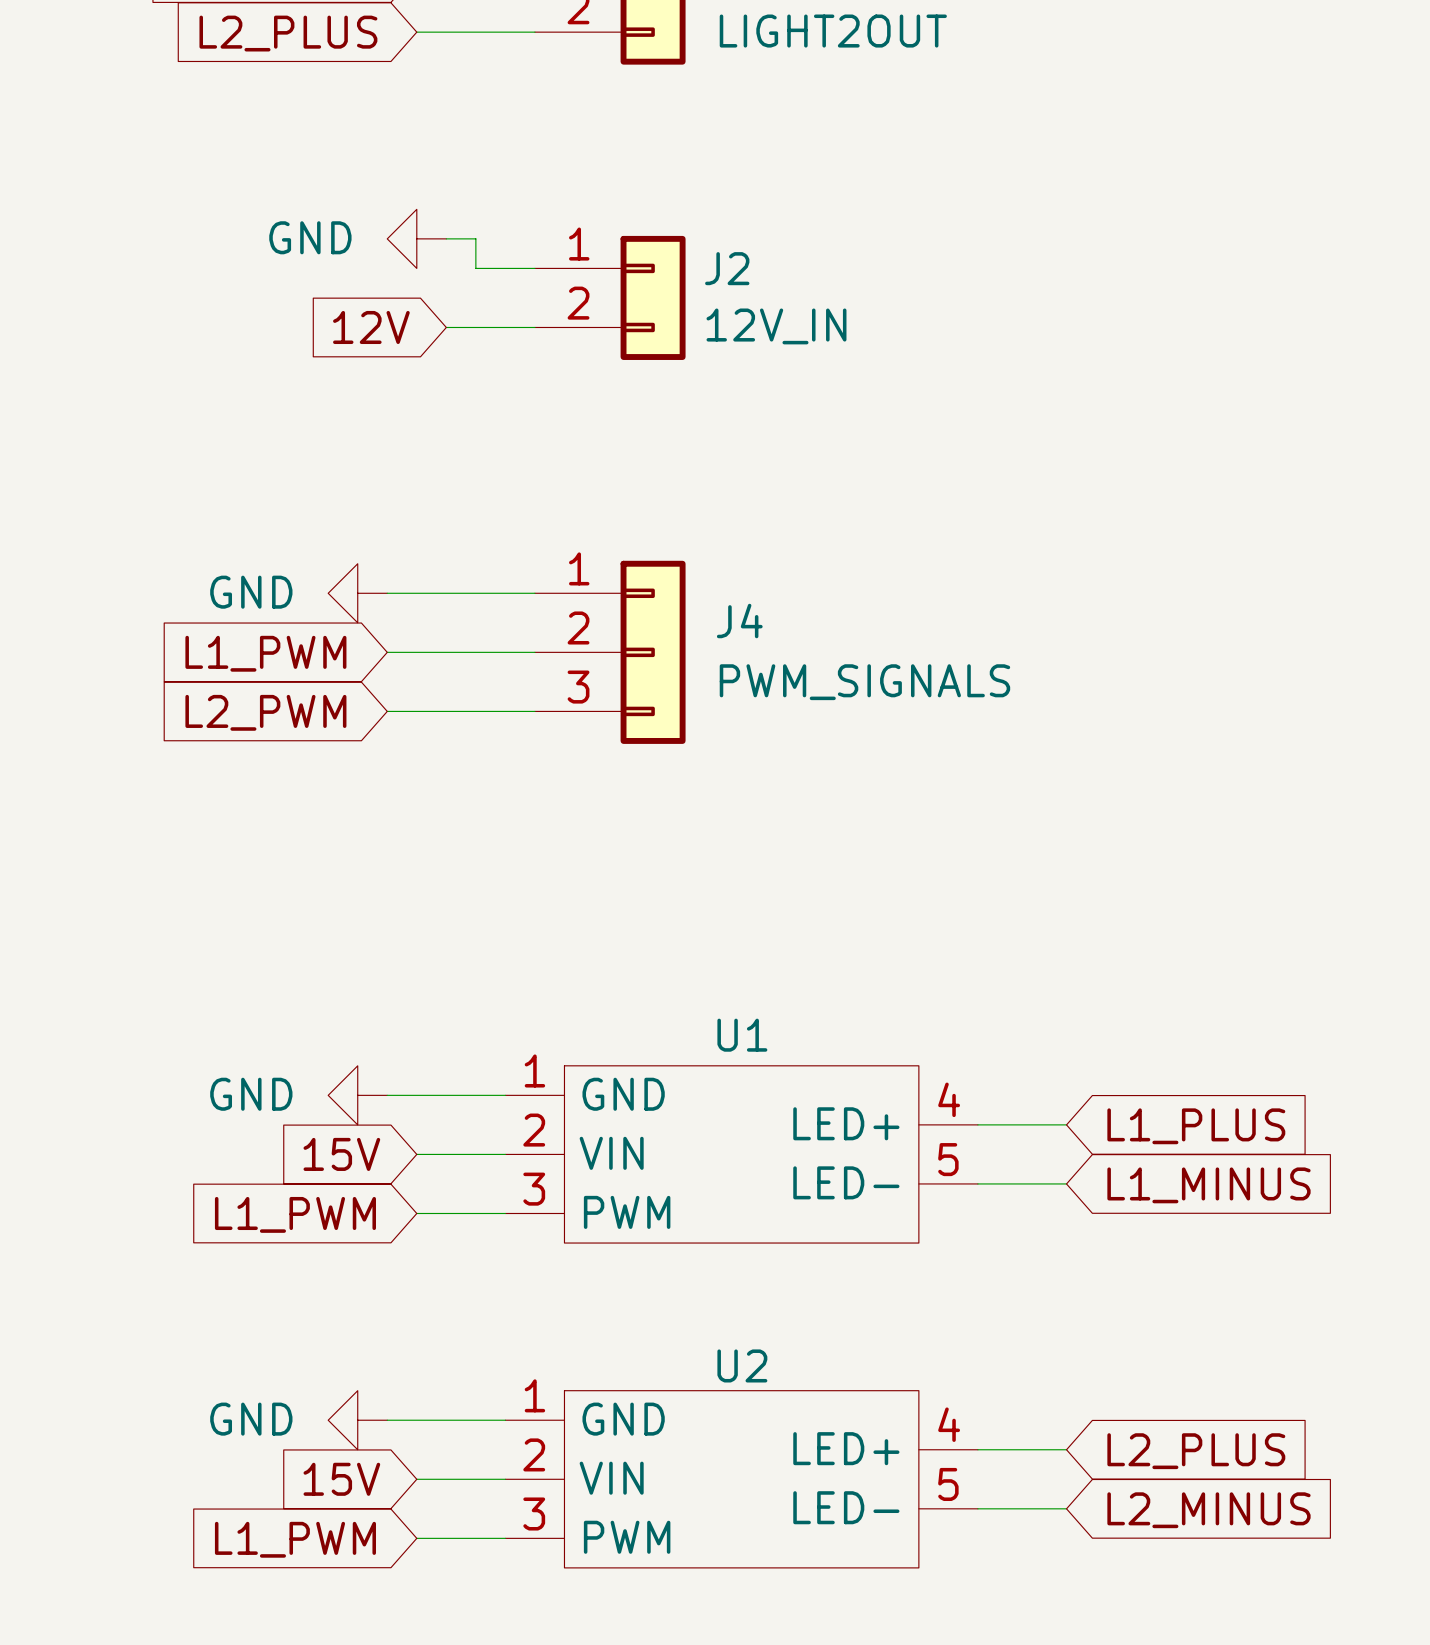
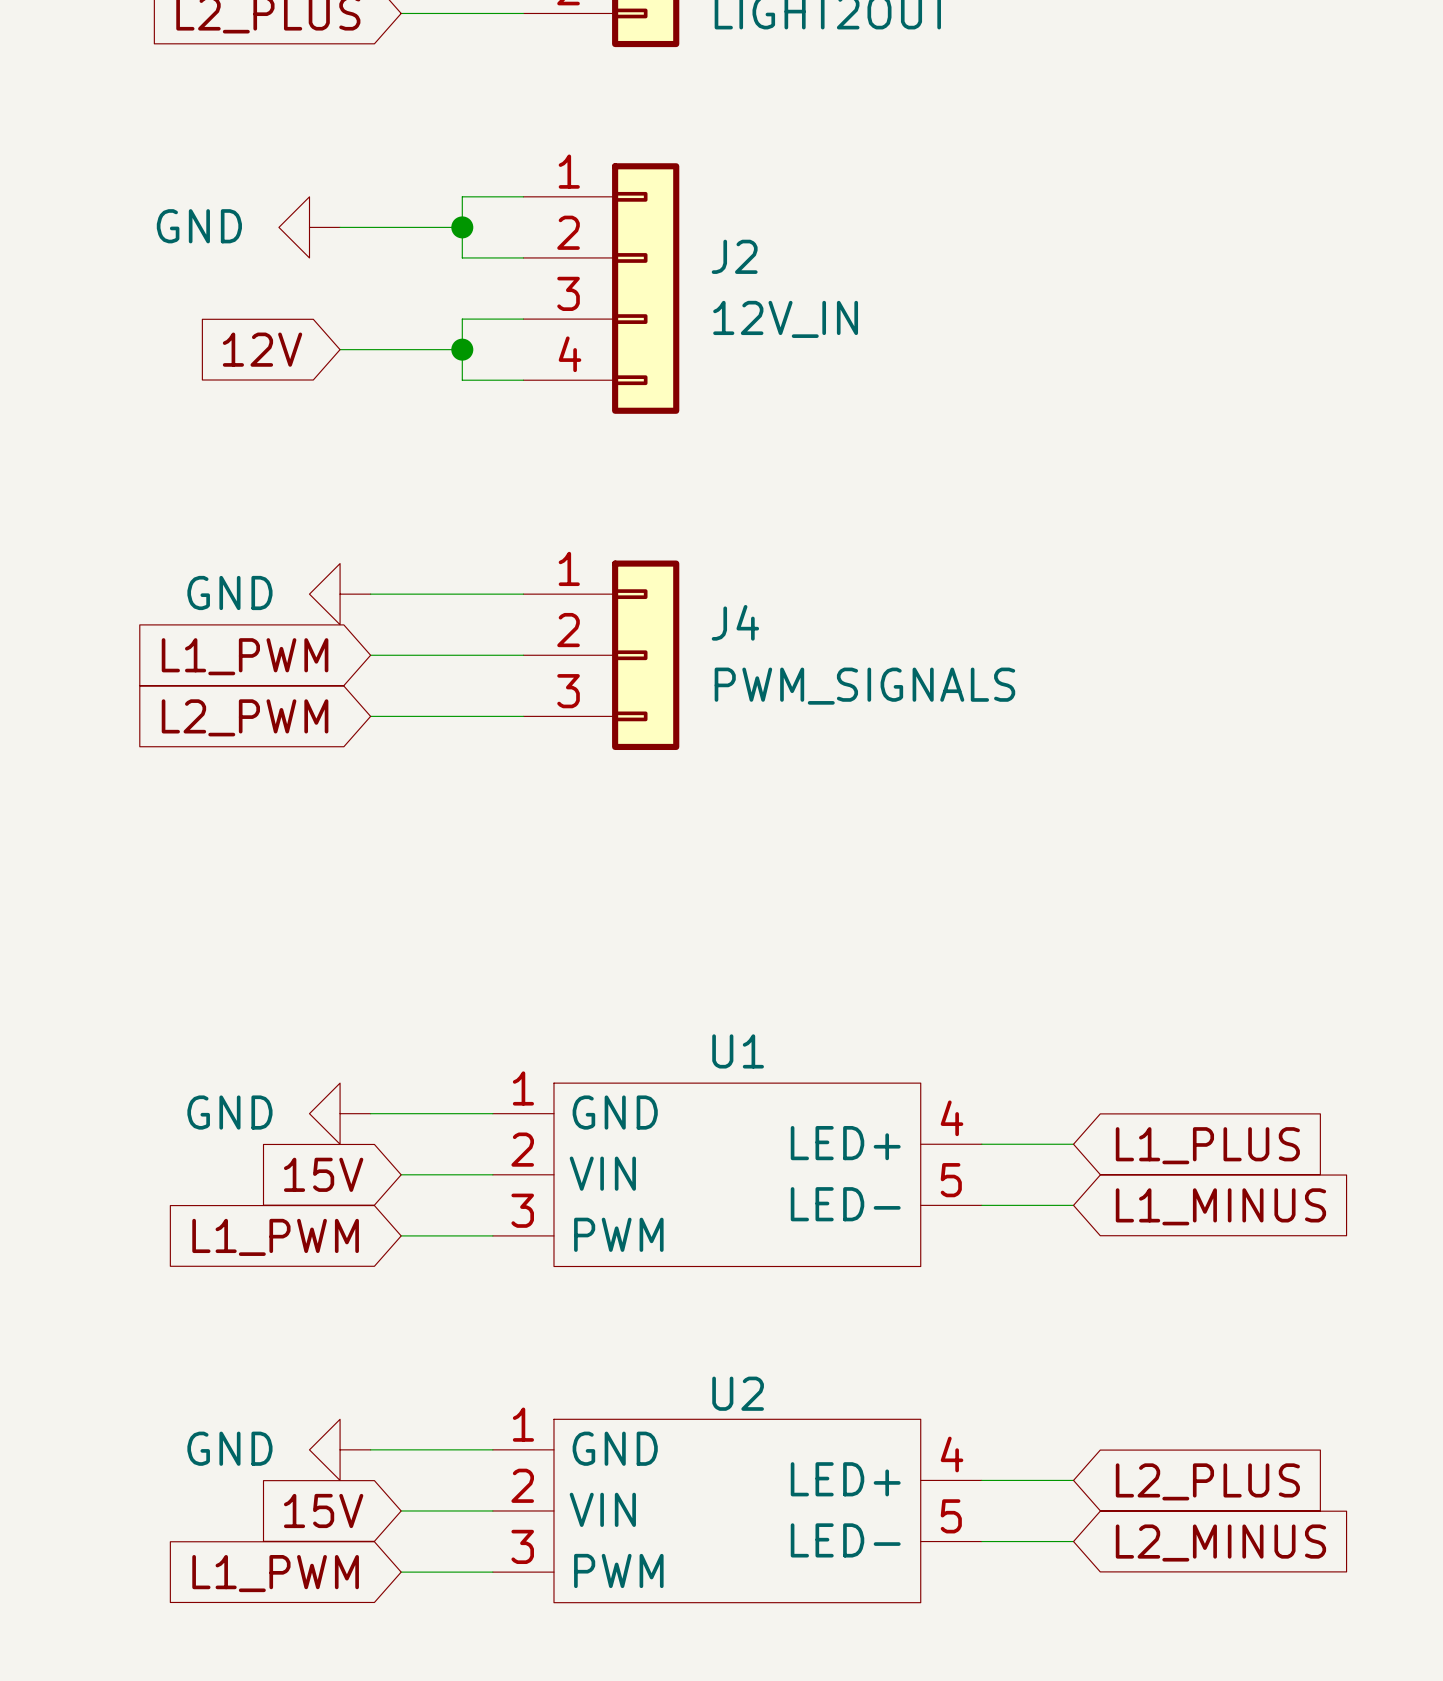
wire: none -> (523, 196) (462, 196) (462, 227)
J2 symbol: [534, 235, 686, 360] -> [523, 163, 680, 414]
wire: none -> (340, 227) (431, 227)
power symbol position: GND (416, 238) -> GND (309, 227)
junction: none -> (462, 227)
global label position: 12V (371, 327) -> 12V (262, 349)
wire: (446, 327) (475, 327) -> (523, 380) (462, 380) (462, 319)
wire: none -> (340, 349) (462, 349)
junction: none -> (462, 349)

